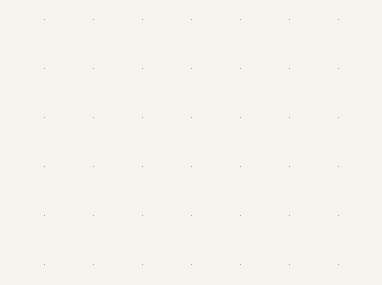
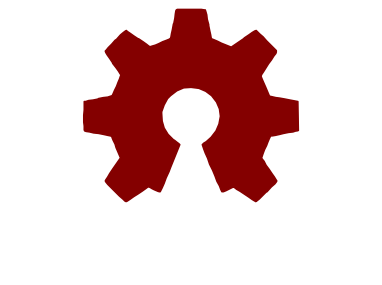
power symbol: none -> (191, 105)

